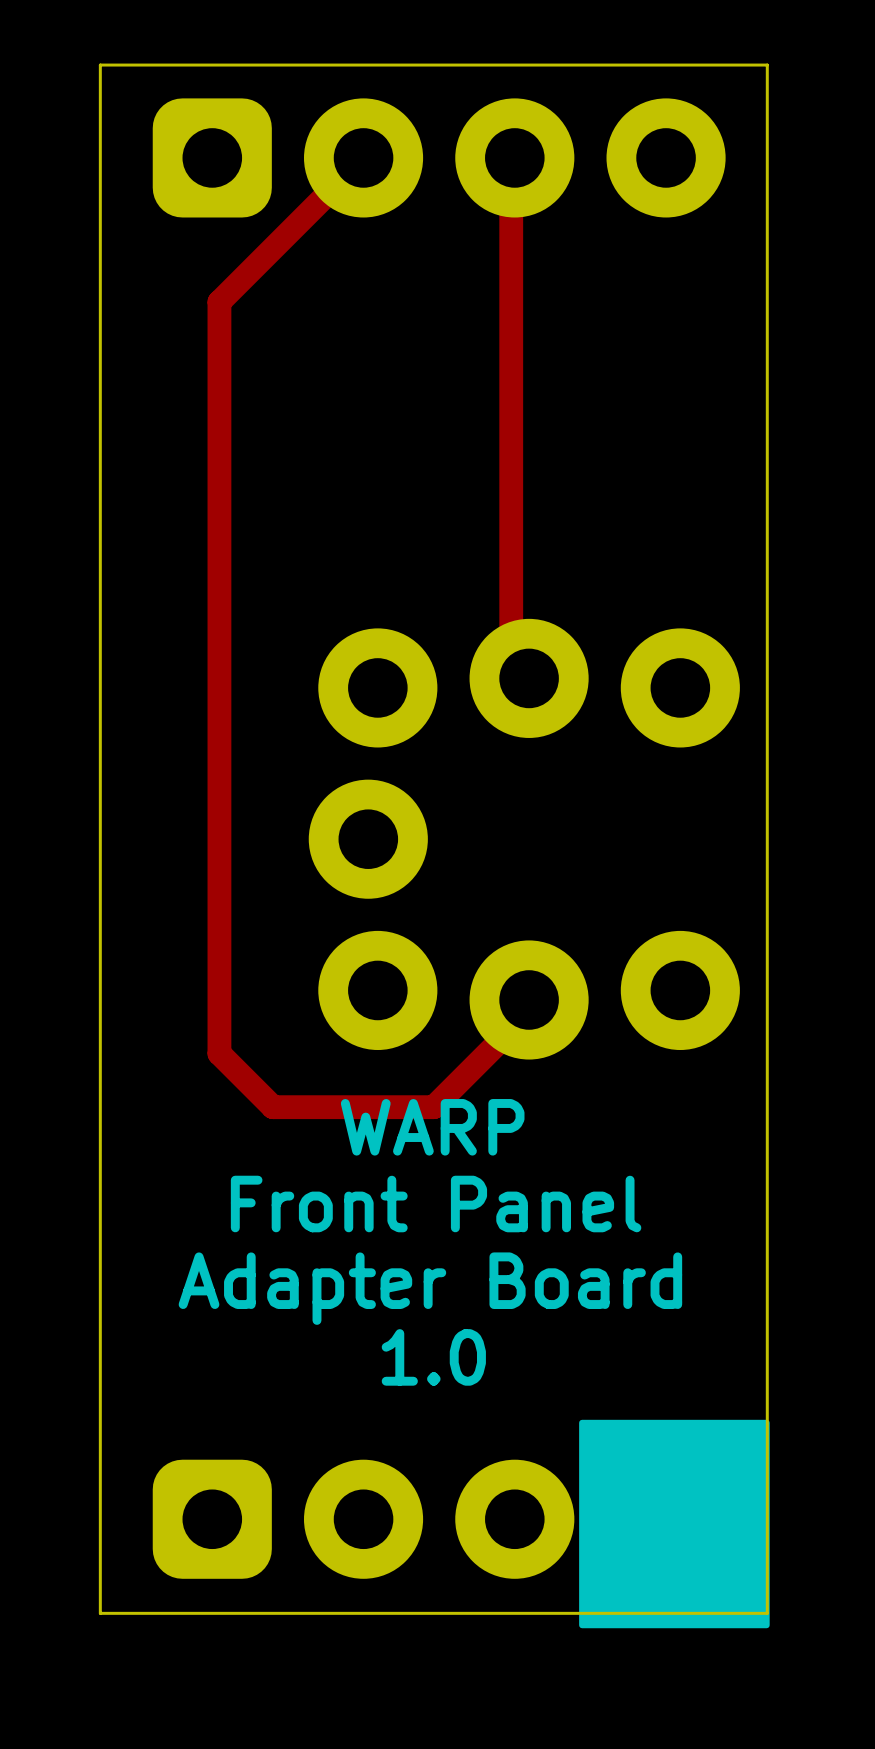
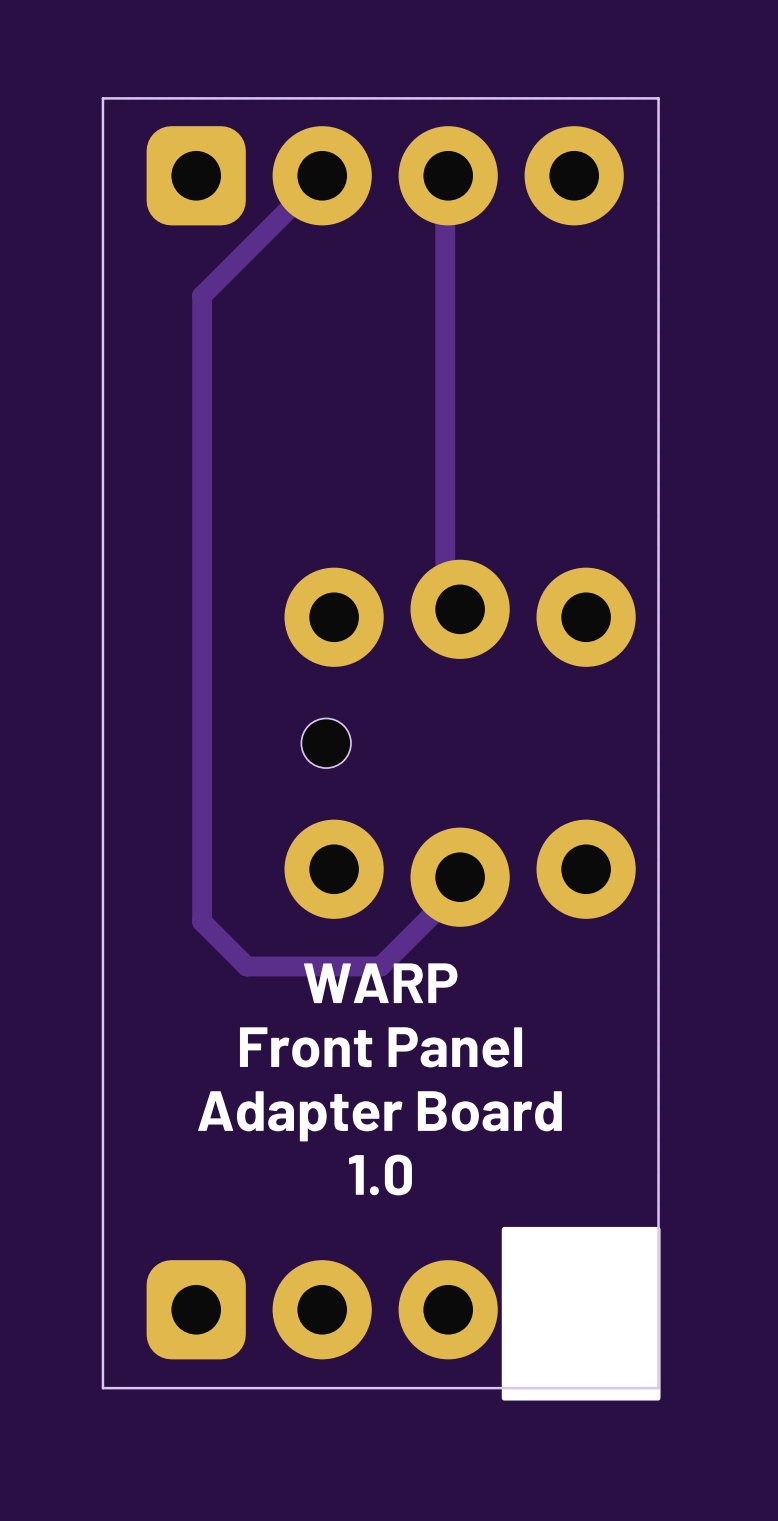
part footprint: [308, 618, 740, 1060] -> [284, 559, 636, 927]

